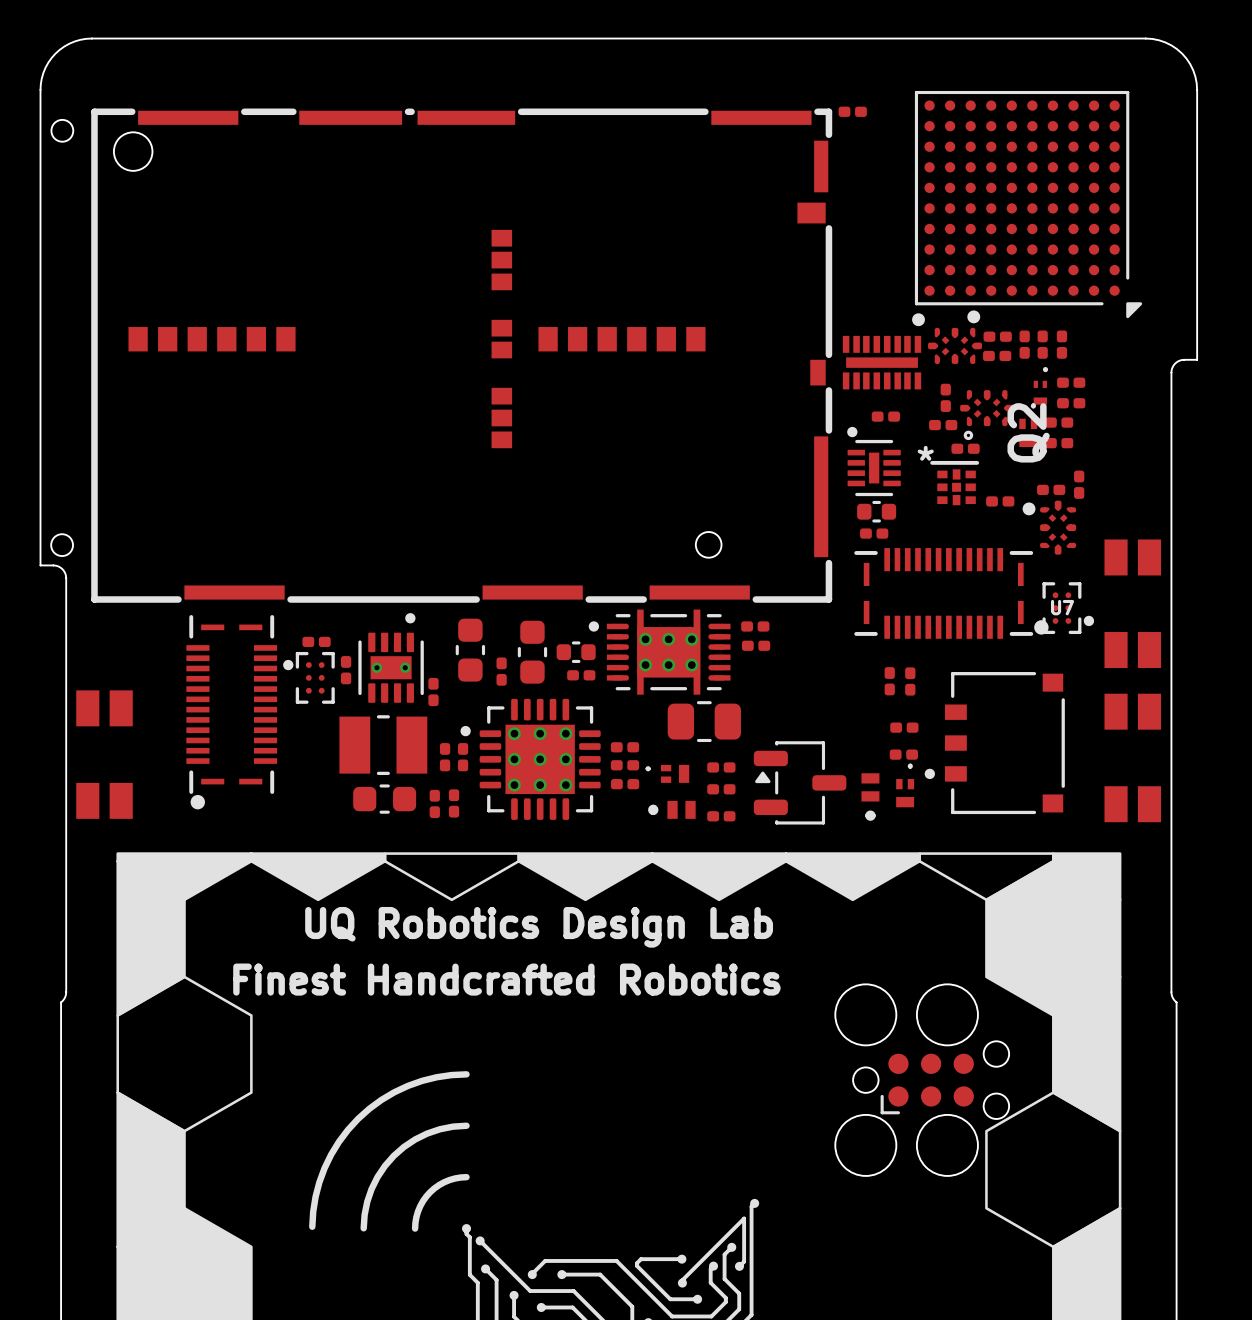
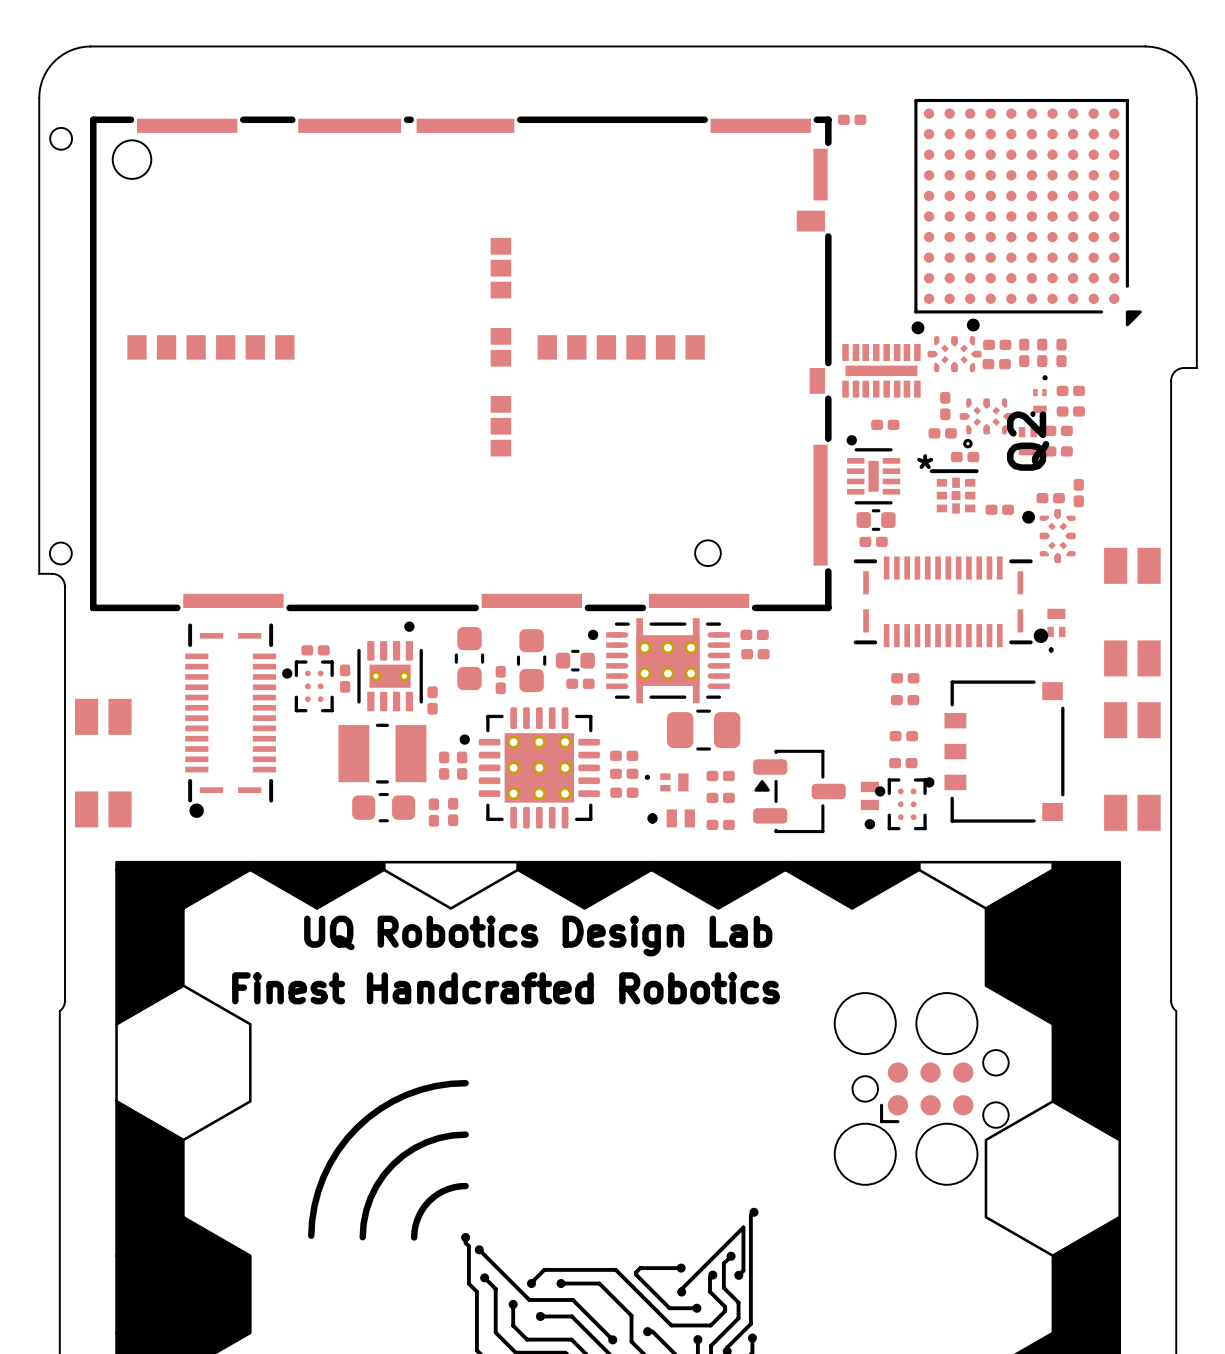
U7: (1068, 608) -> none
part: none -> (1056, 630)
part: none -> (905, 678)
part: (889, 681) -> none
part: (910, 681) -> none
part: none -> (905, 700)
part footprint: [896, 763, 915, 808] -> [875, 778, 927, 831]

